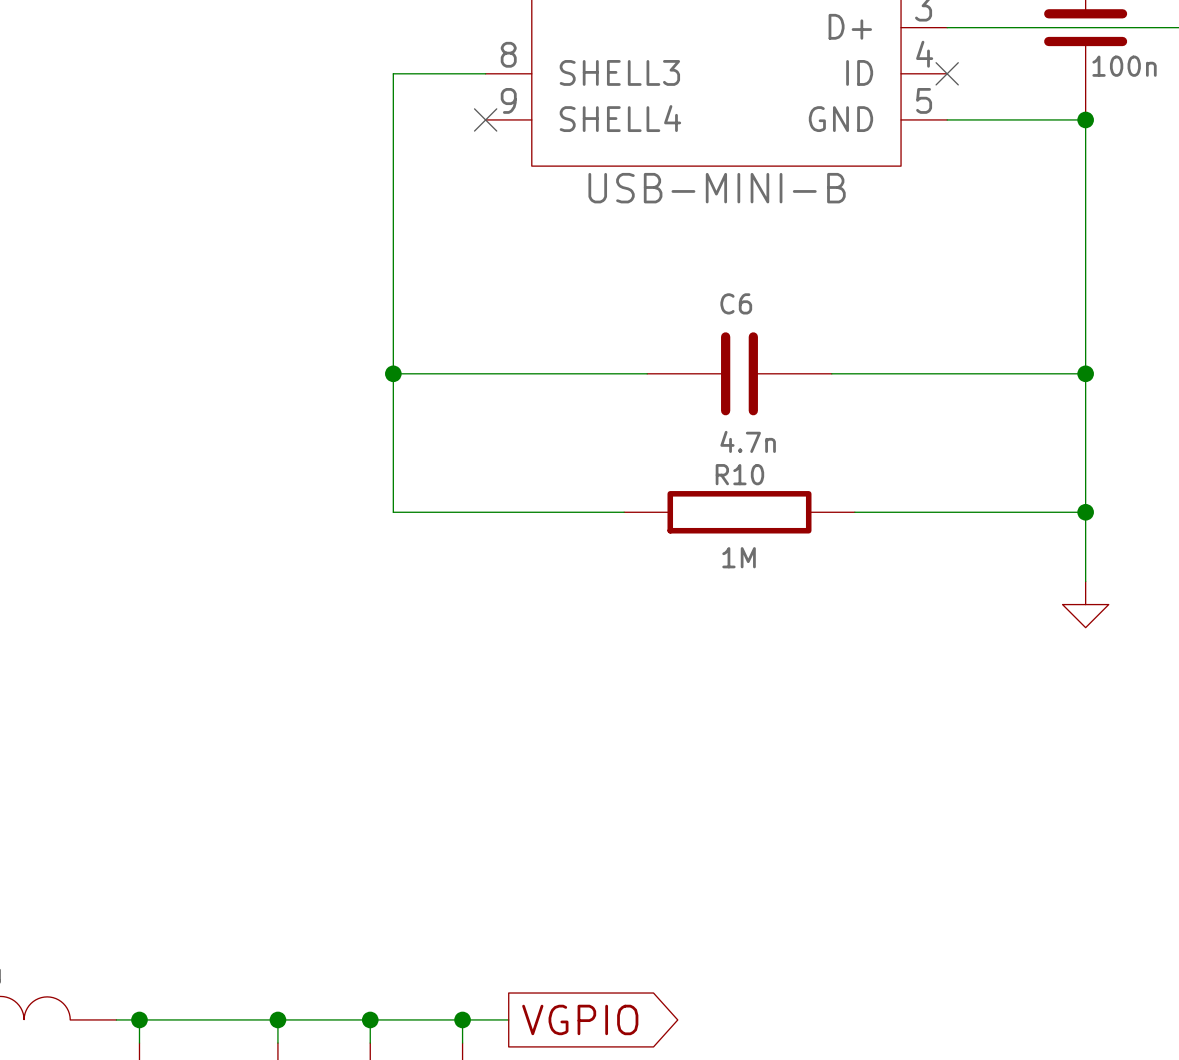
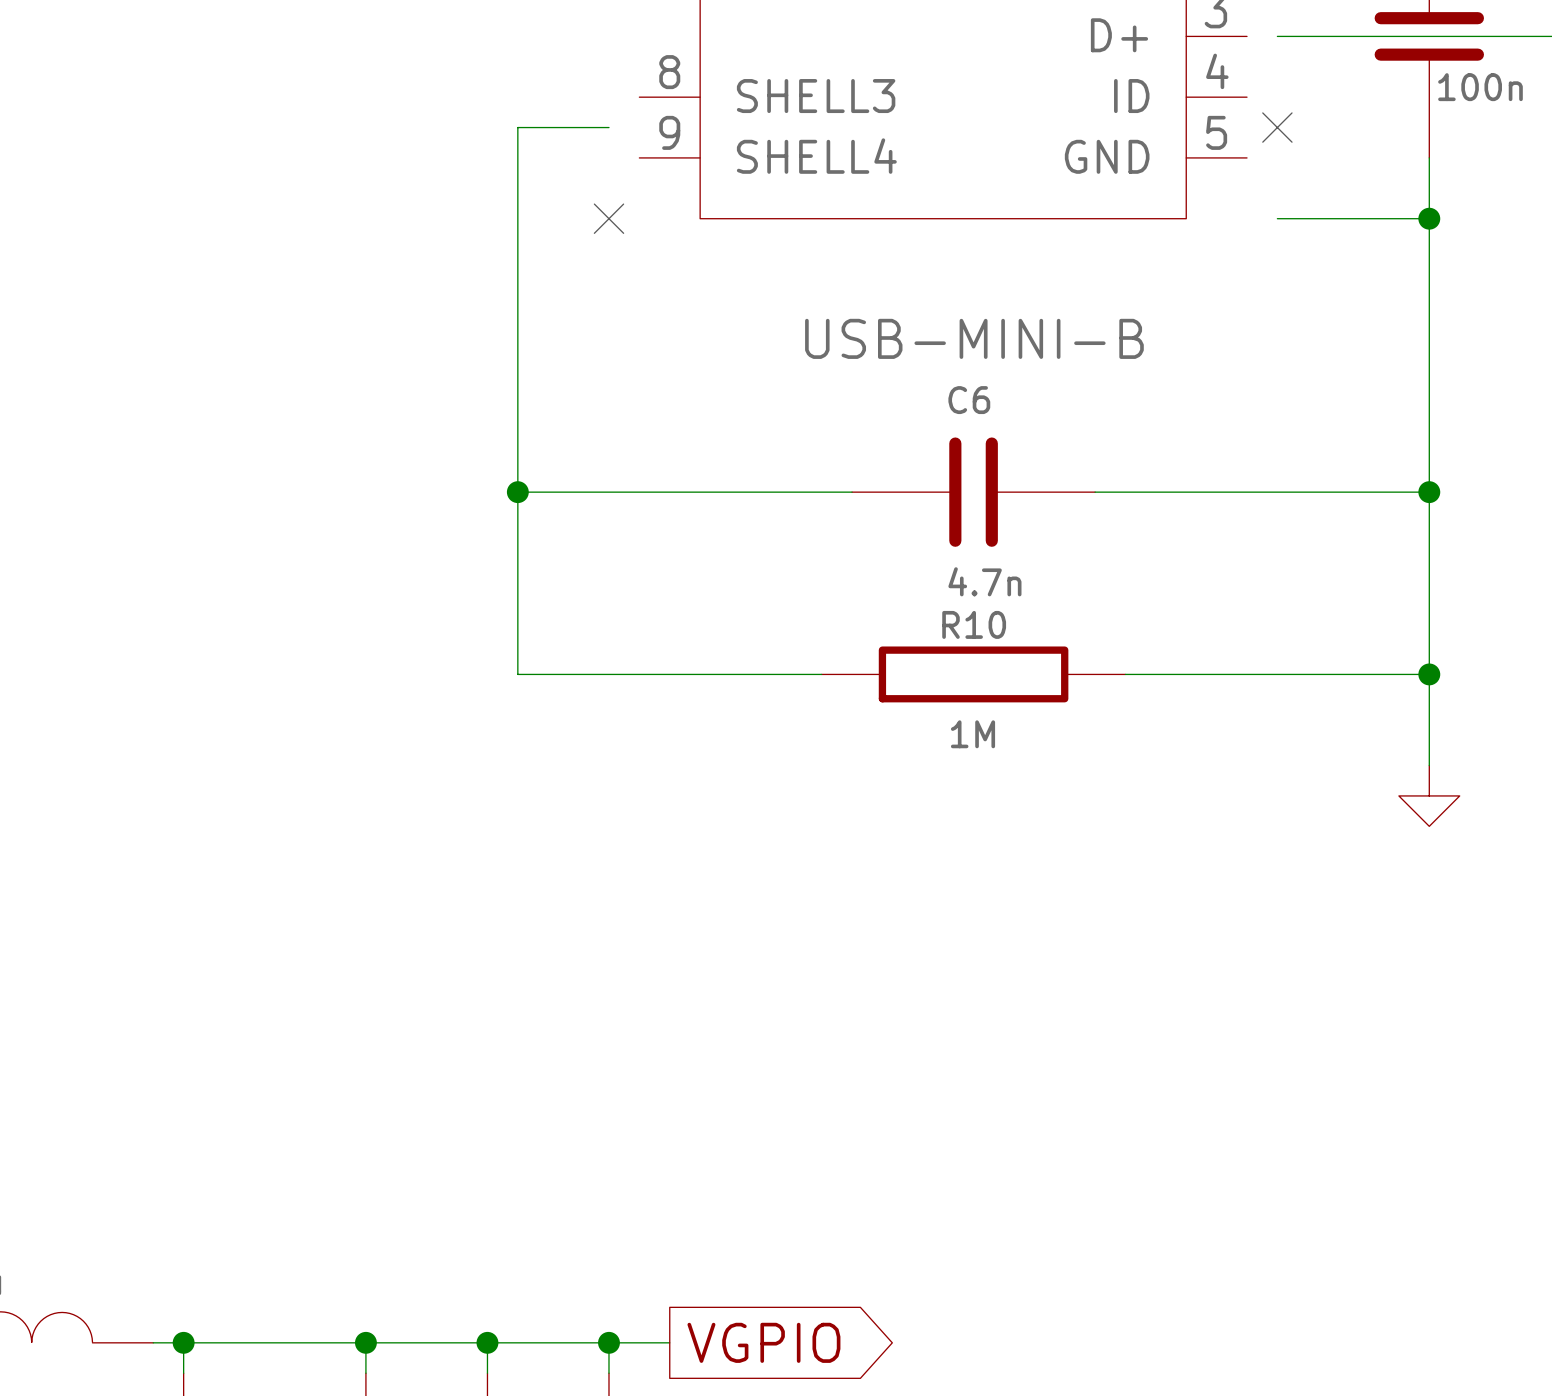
wire: (947, 27) (970, 27) -> none
wire: (485, 73) (393, 73) (393, 96) -> (608, 127) (517, 127)
no-connect mark position: (947, 73) -> (1277, 127)
no-connect mark position: (485, 119) -> (608, 218)
wire: (947, 119) (1085, 119) -> none
junction position: (1085, 119) -> (1429, 218)
wire: none -> (1277, 218) (1429, 218)
part value position: USB-MINI-B (717, 188) -> USB-MINI-B (974, 338)

